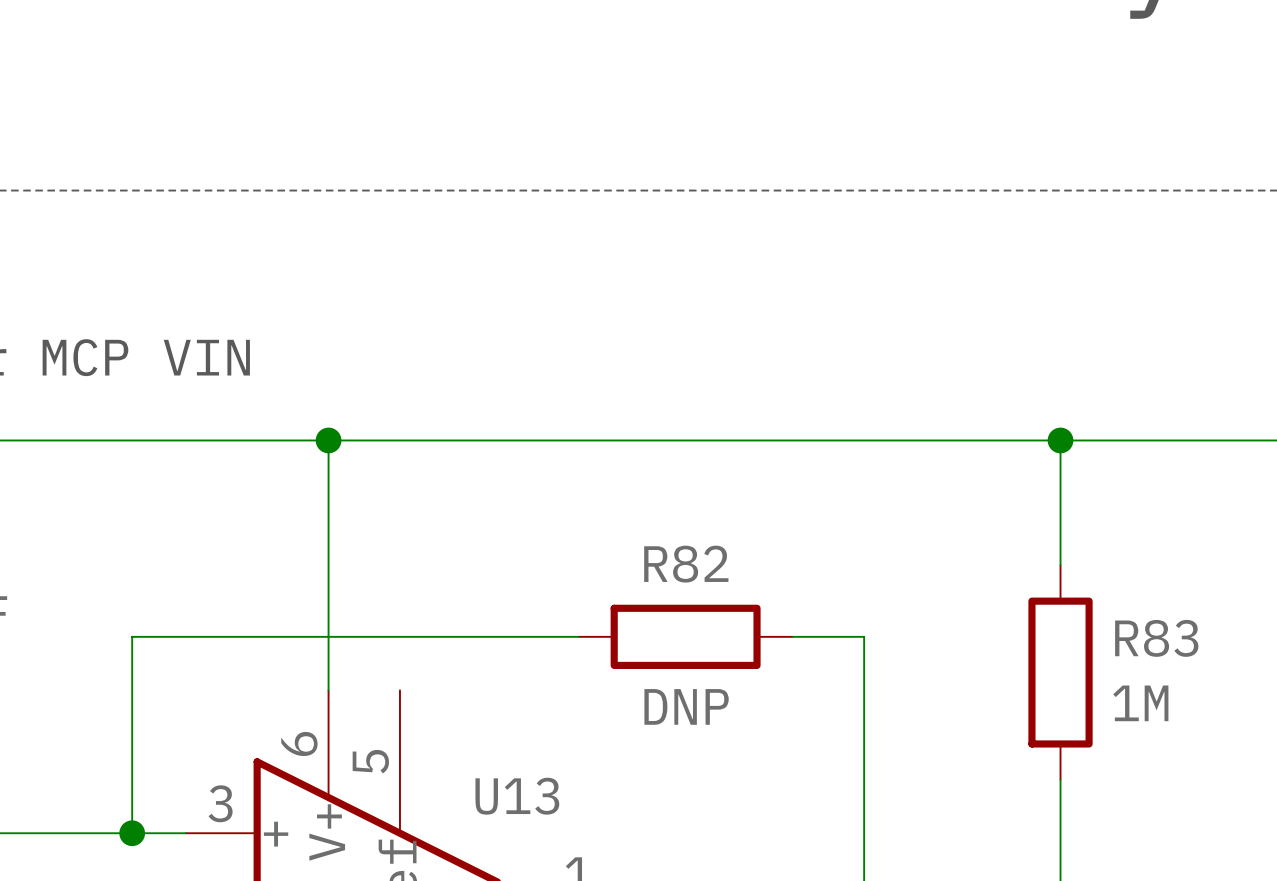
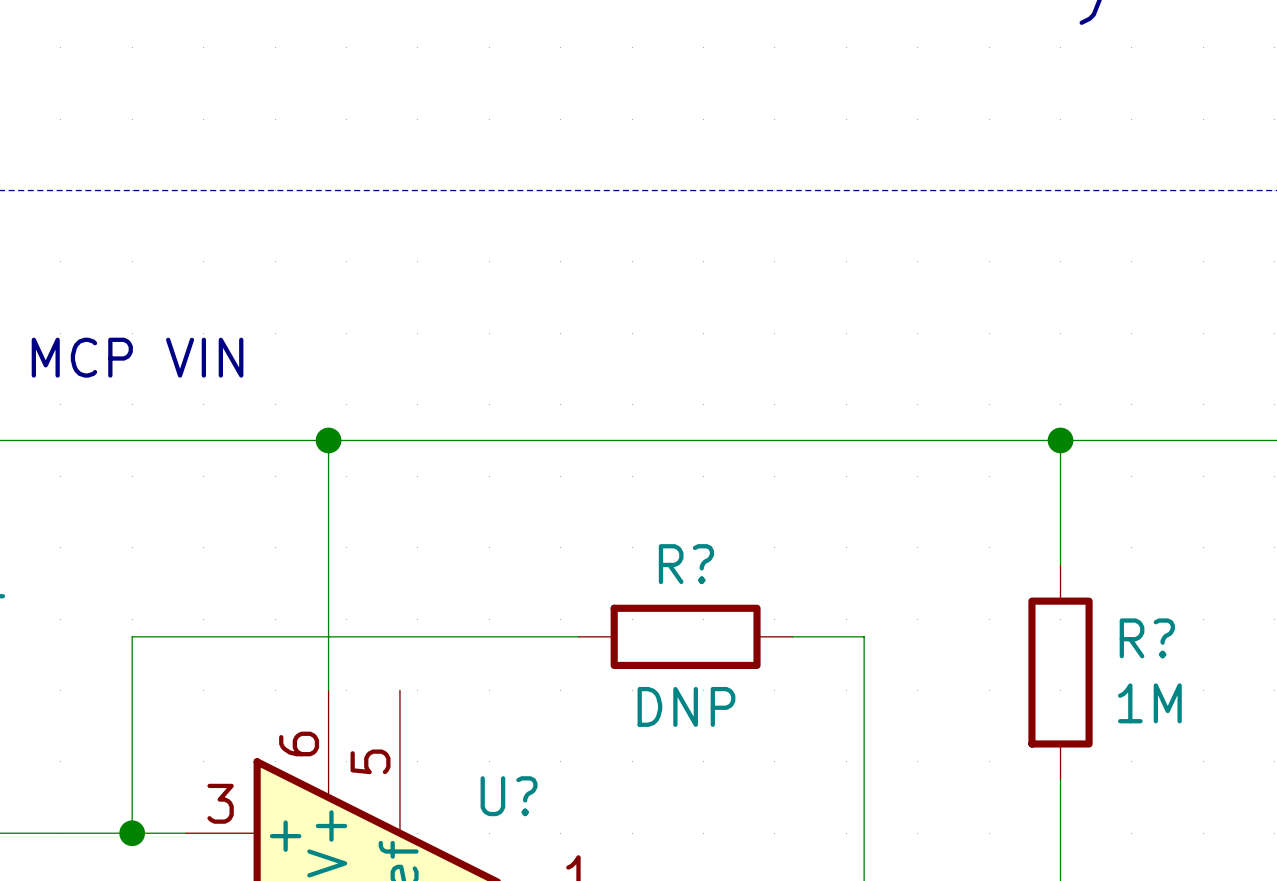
R82 name: R82 (686, 564) -> R? (686, 564)
R83 name: R83 (1156, 638) -> R? (1147, 638)
U13 name: U13 (517, 796) -> U? (509, 796)

